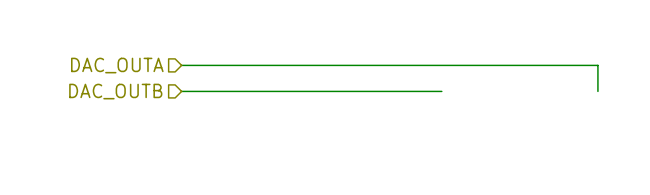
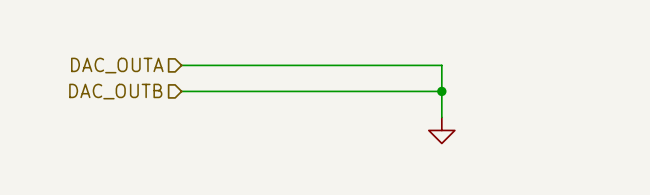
wire: (441, 65) (597, 65) (597, 91) -> (441, 65) (441, 117)
junction: none -> (441, 91)
power symbol: none -> (441, 130)

